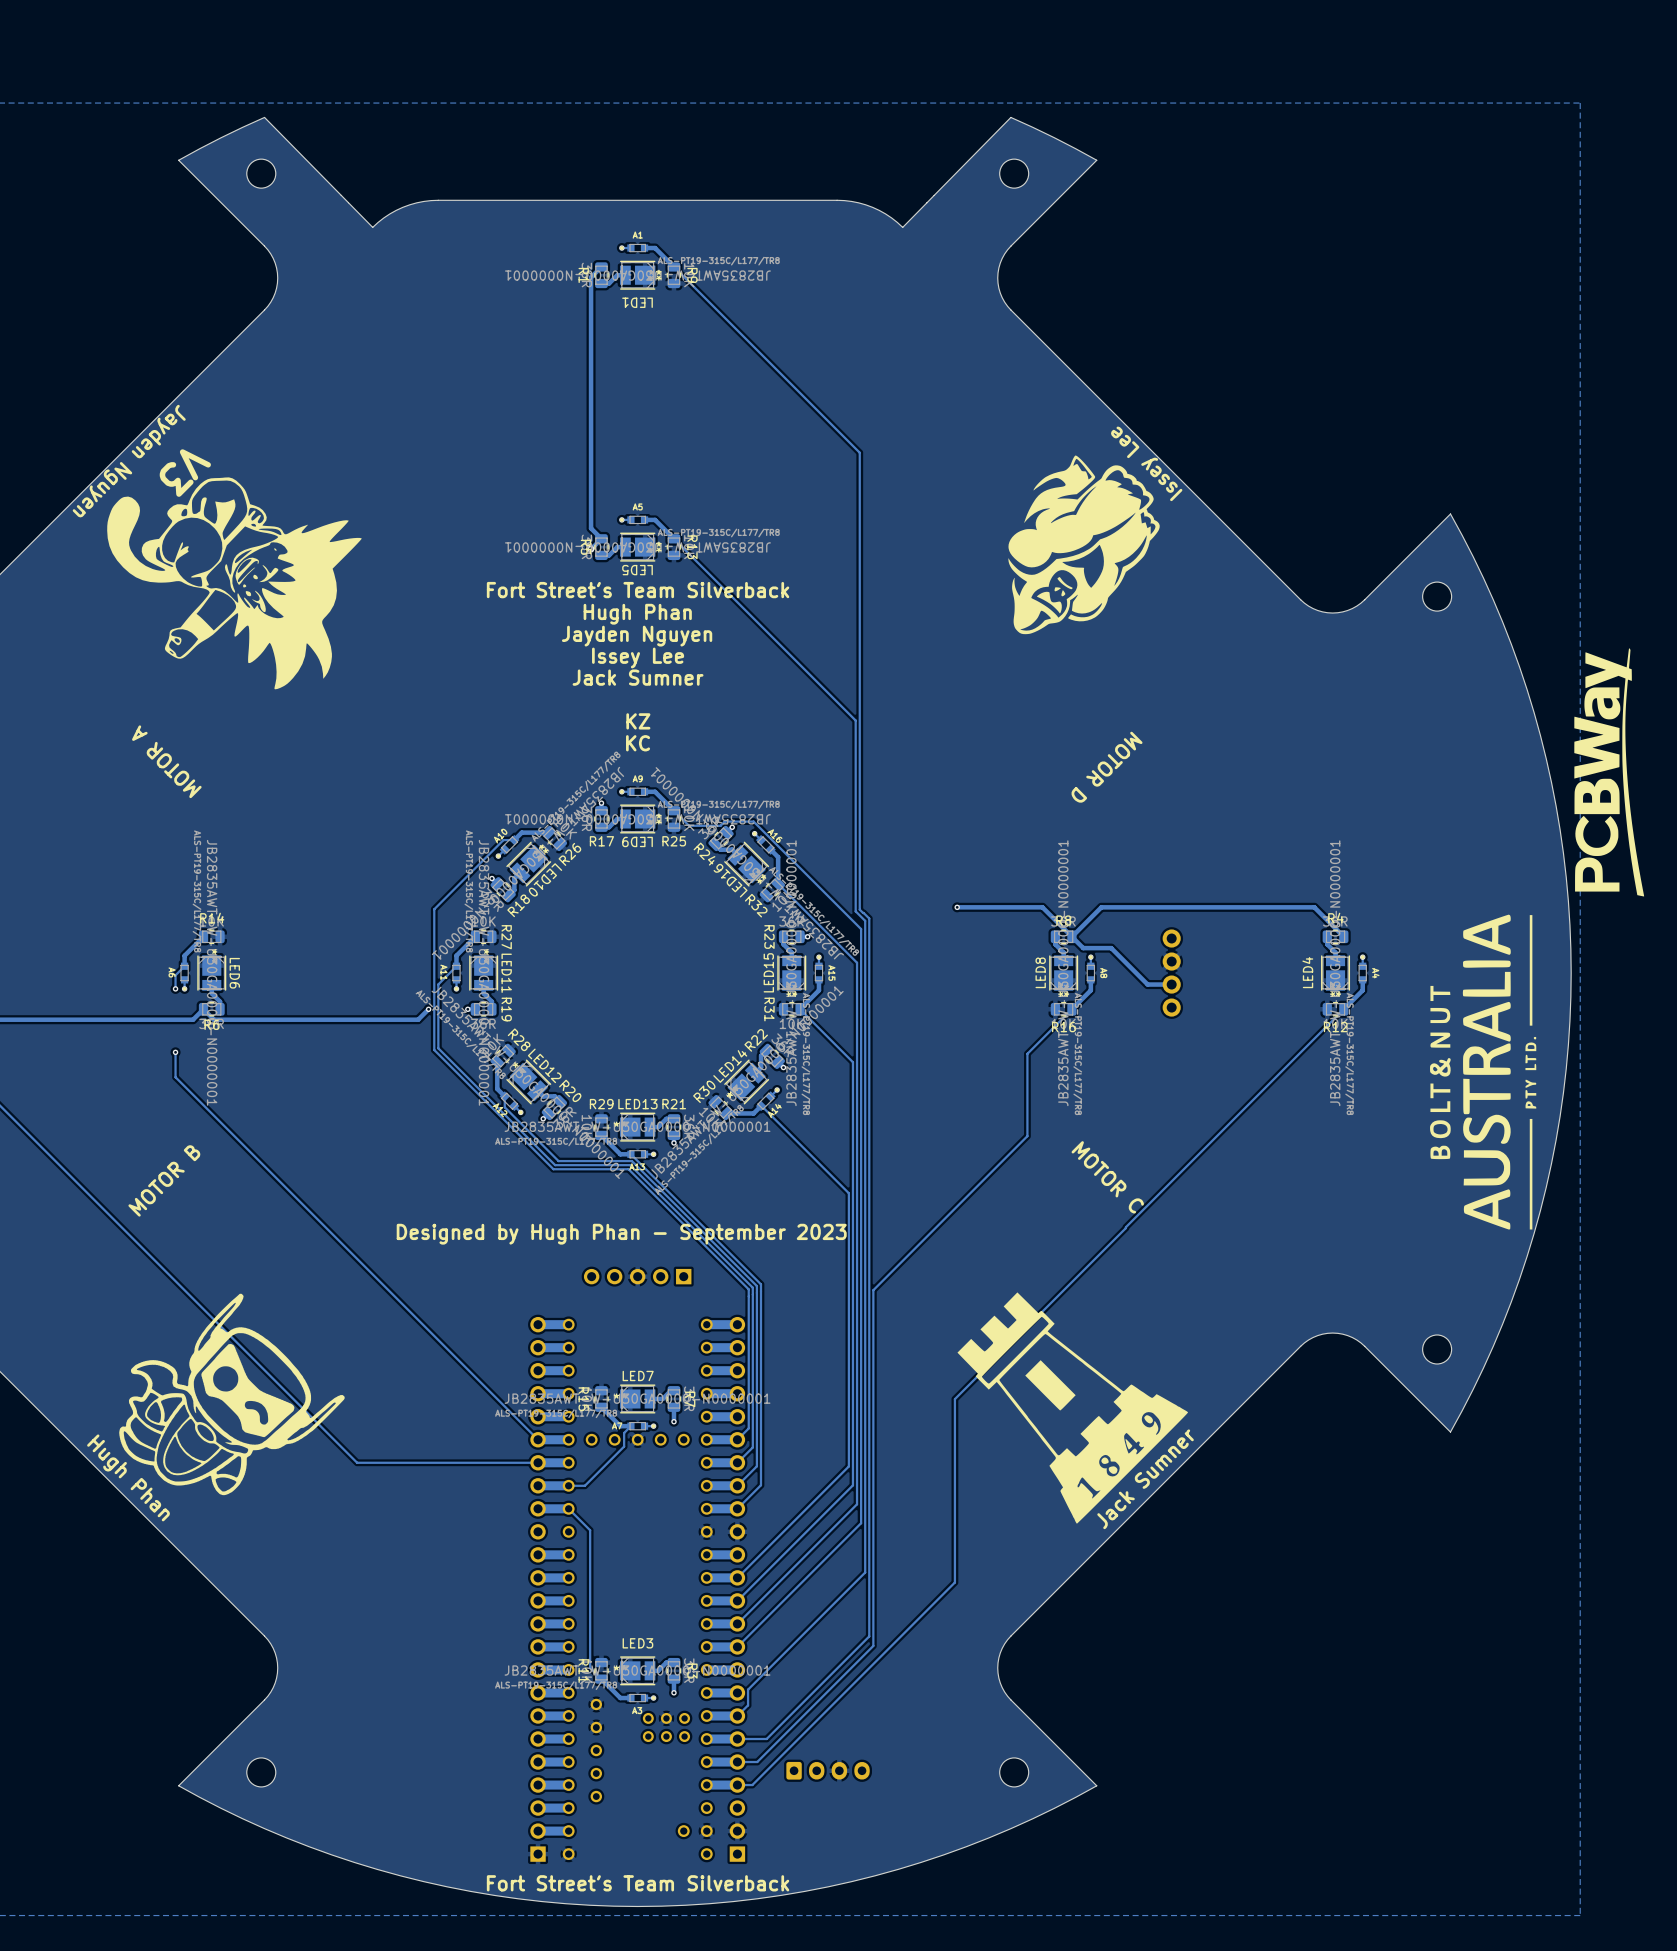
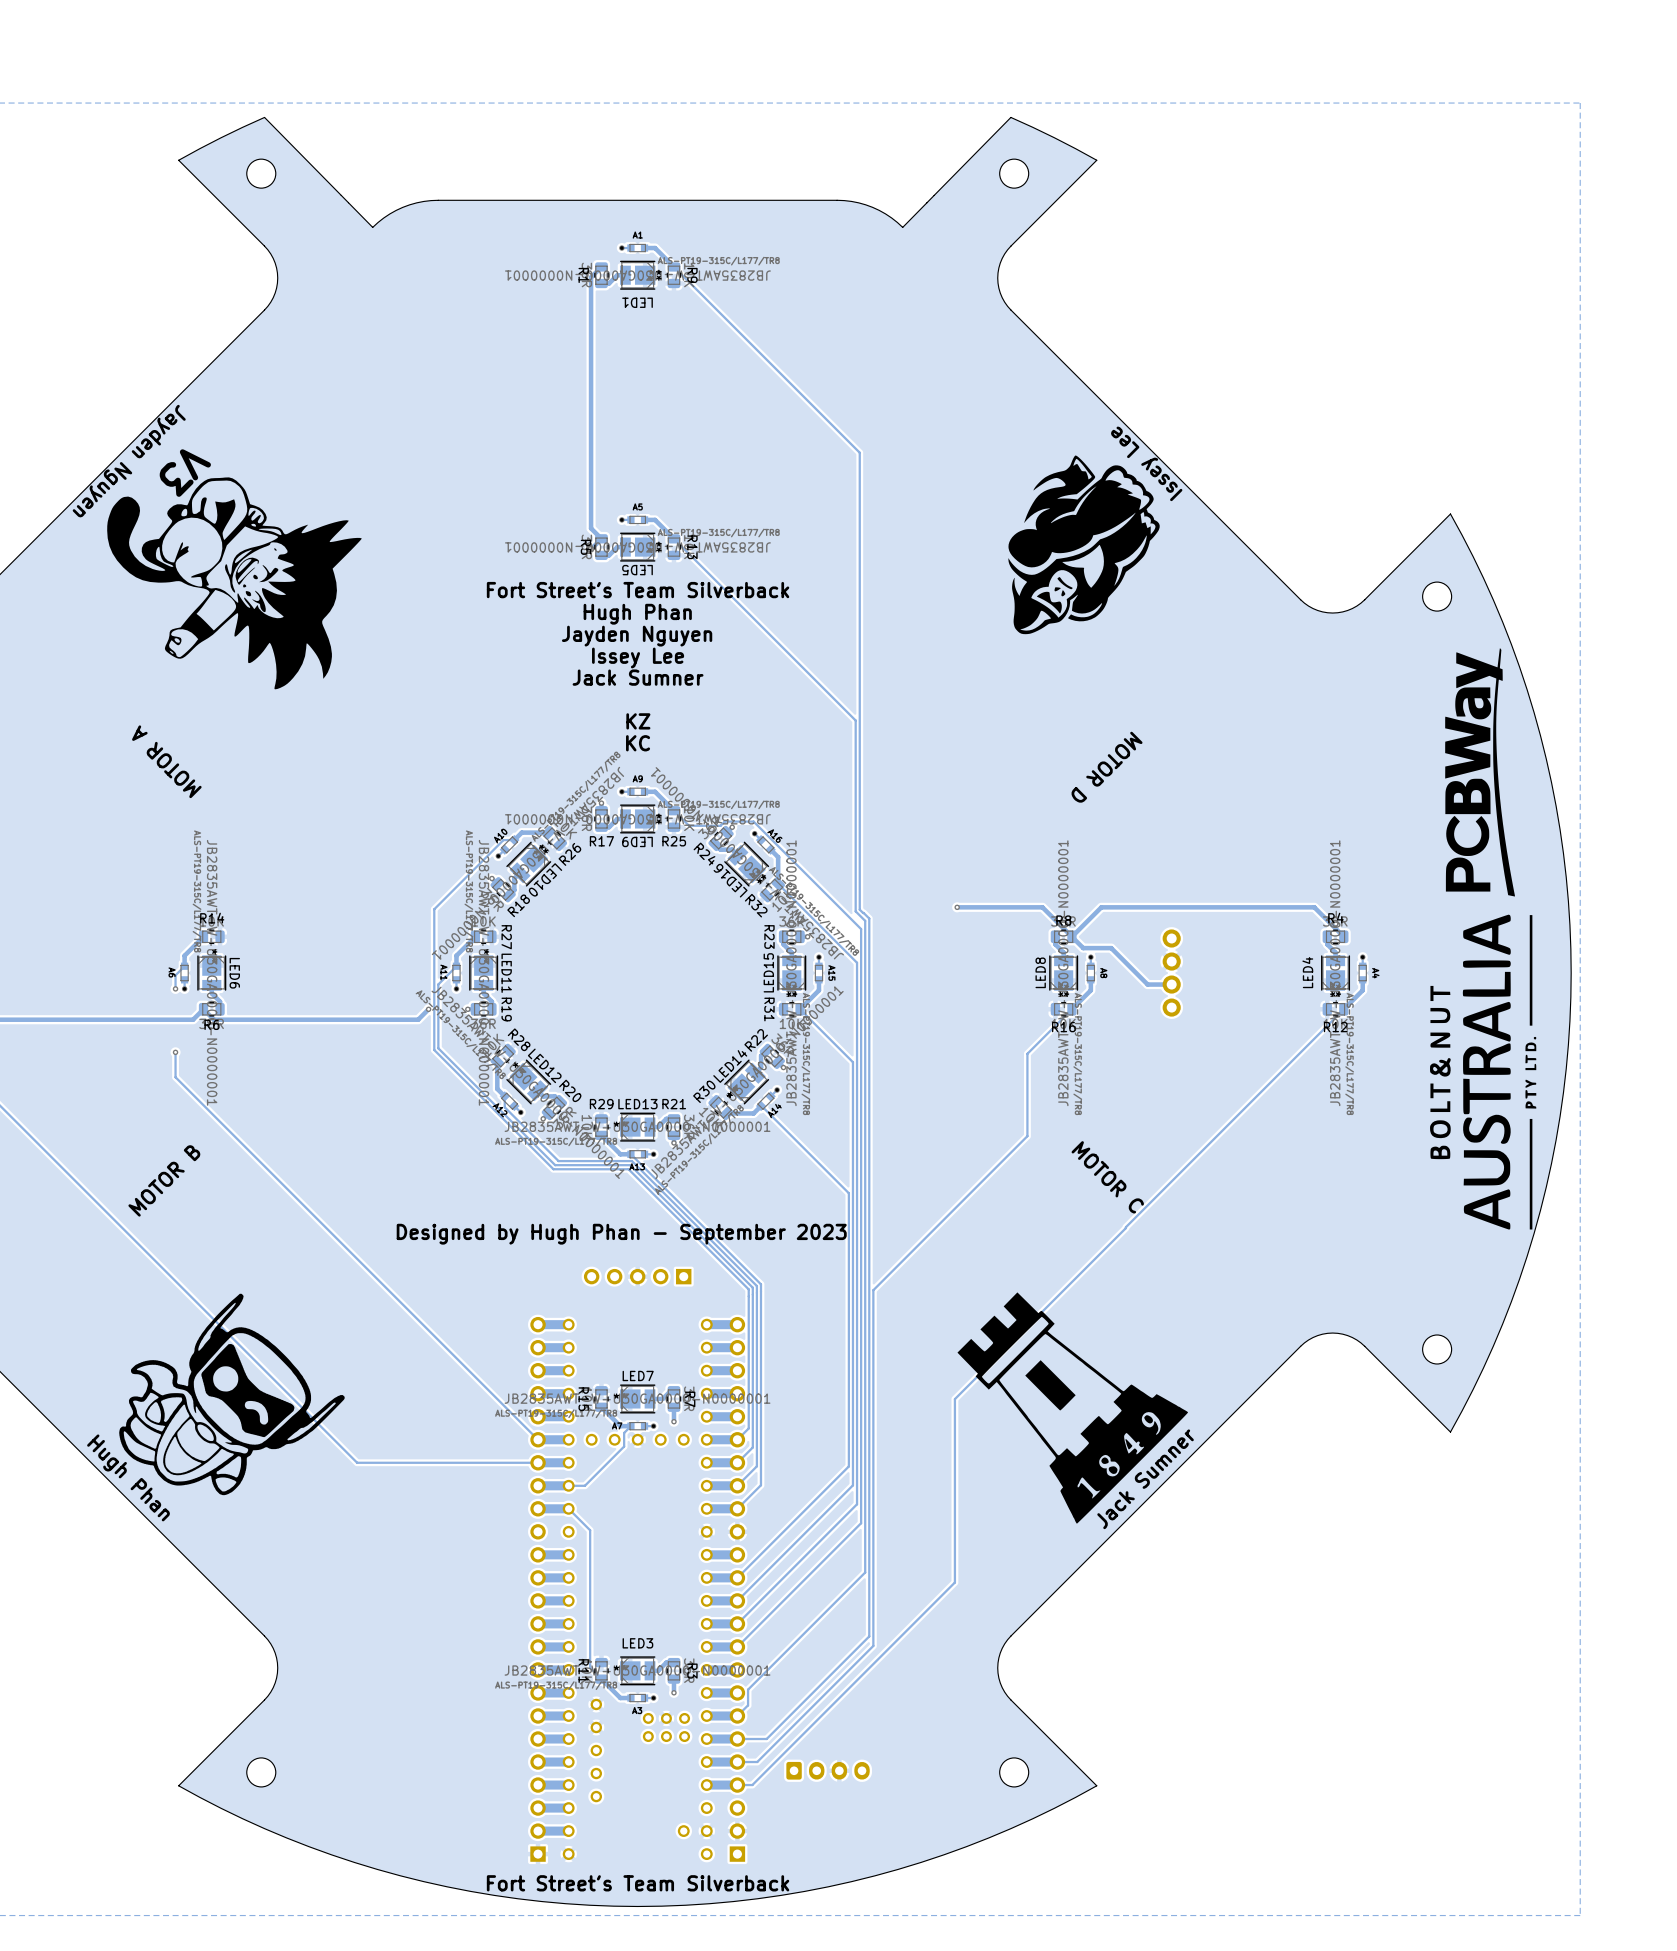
drawing position: (1609, 772) -> (1480, 772)

